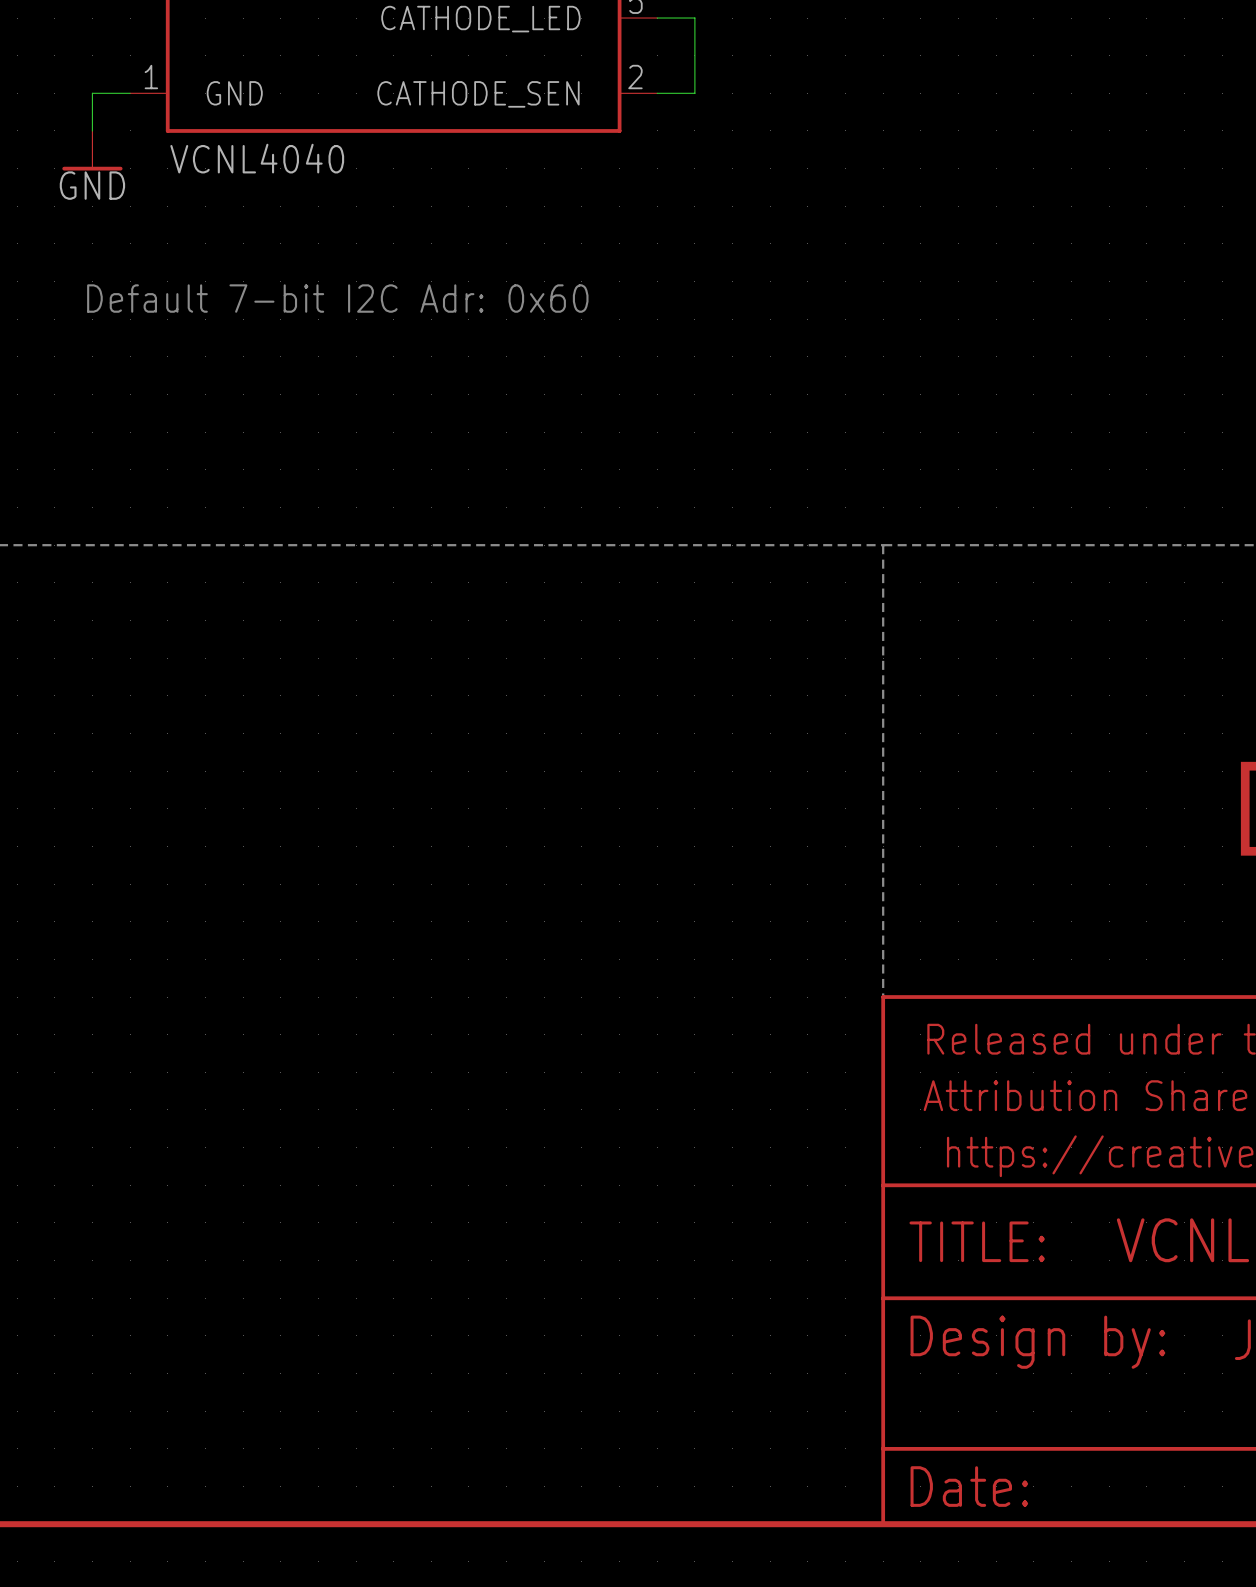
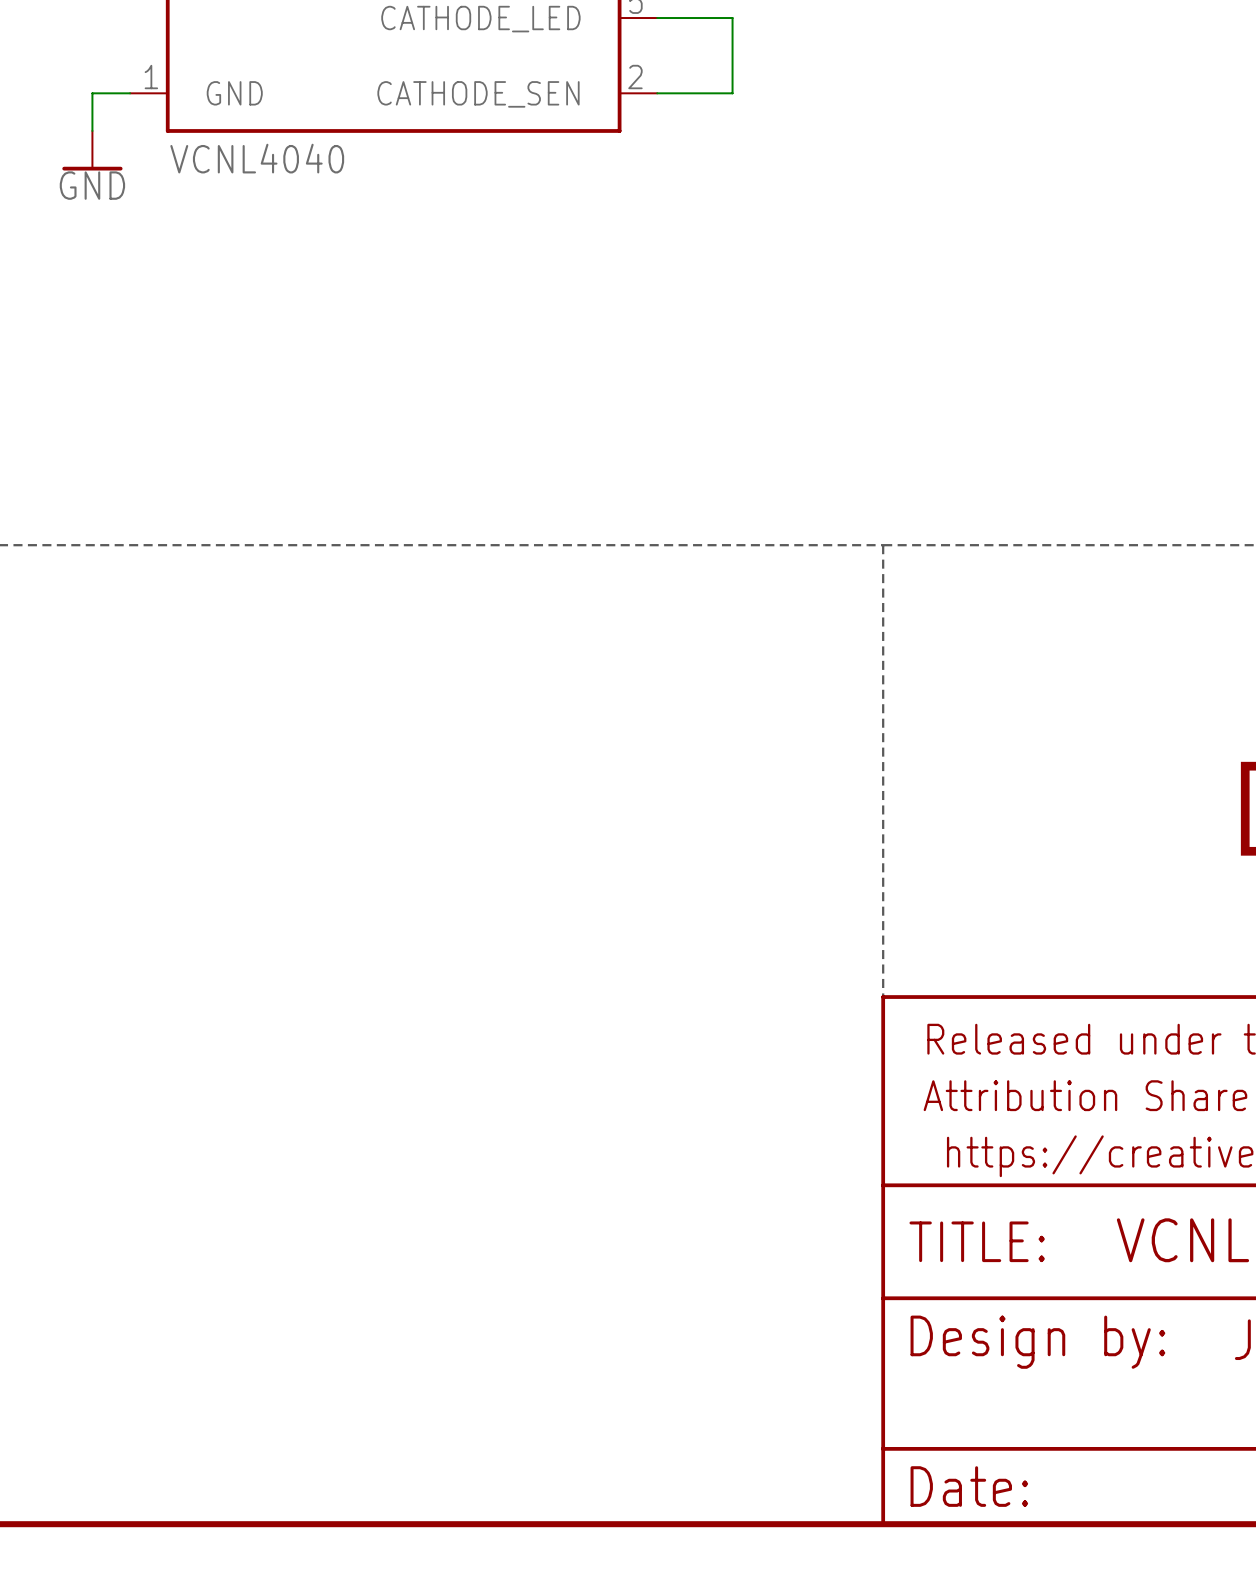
wire: (694, 18) (694, 93) -> (694, 18) (732, 18) (732, 93) (694, 93)
text: Default 7-bit I2C Adr: 0x60 (337, 298) -> none

